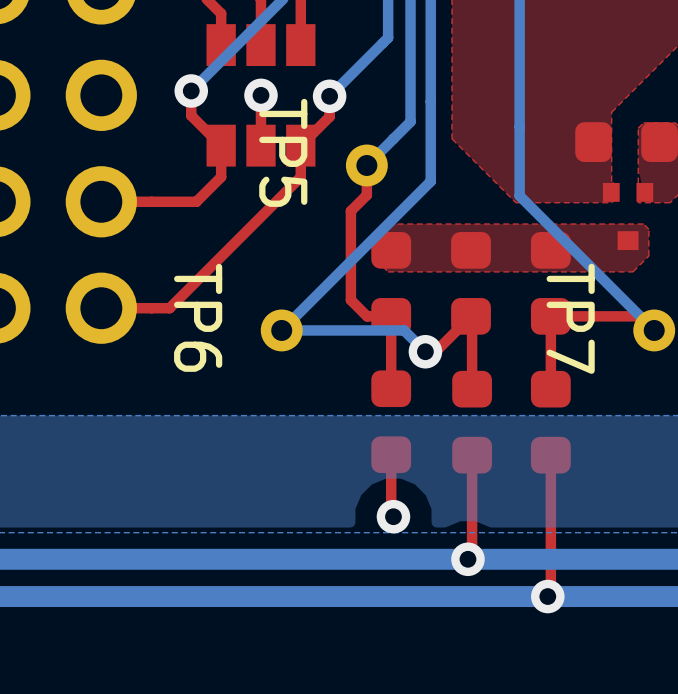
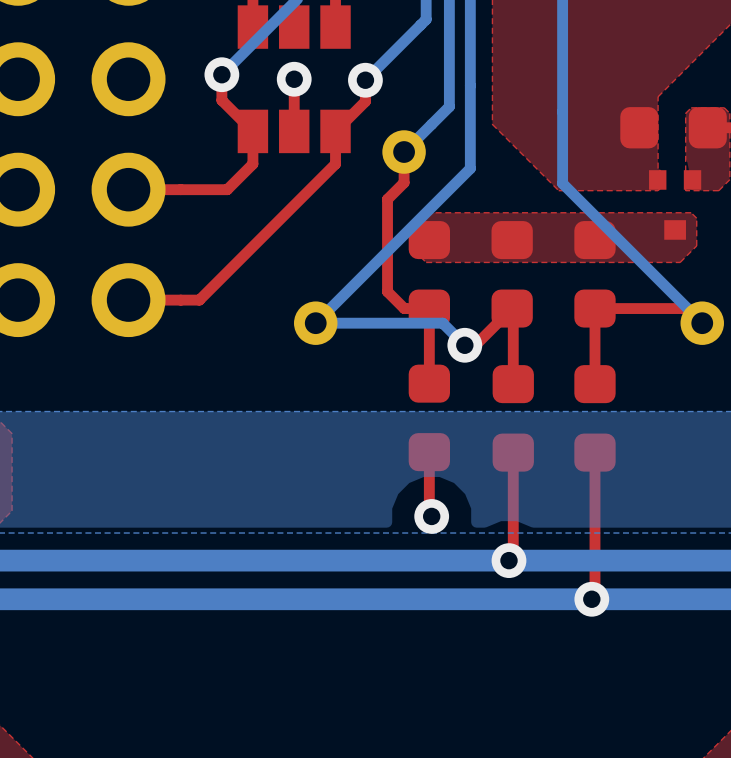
TP5 name: TP5 (283, 152) -> none
TP6 name: TP6 (198, 317) -> none
TP7 name: TP7 (570, 318) -> none

